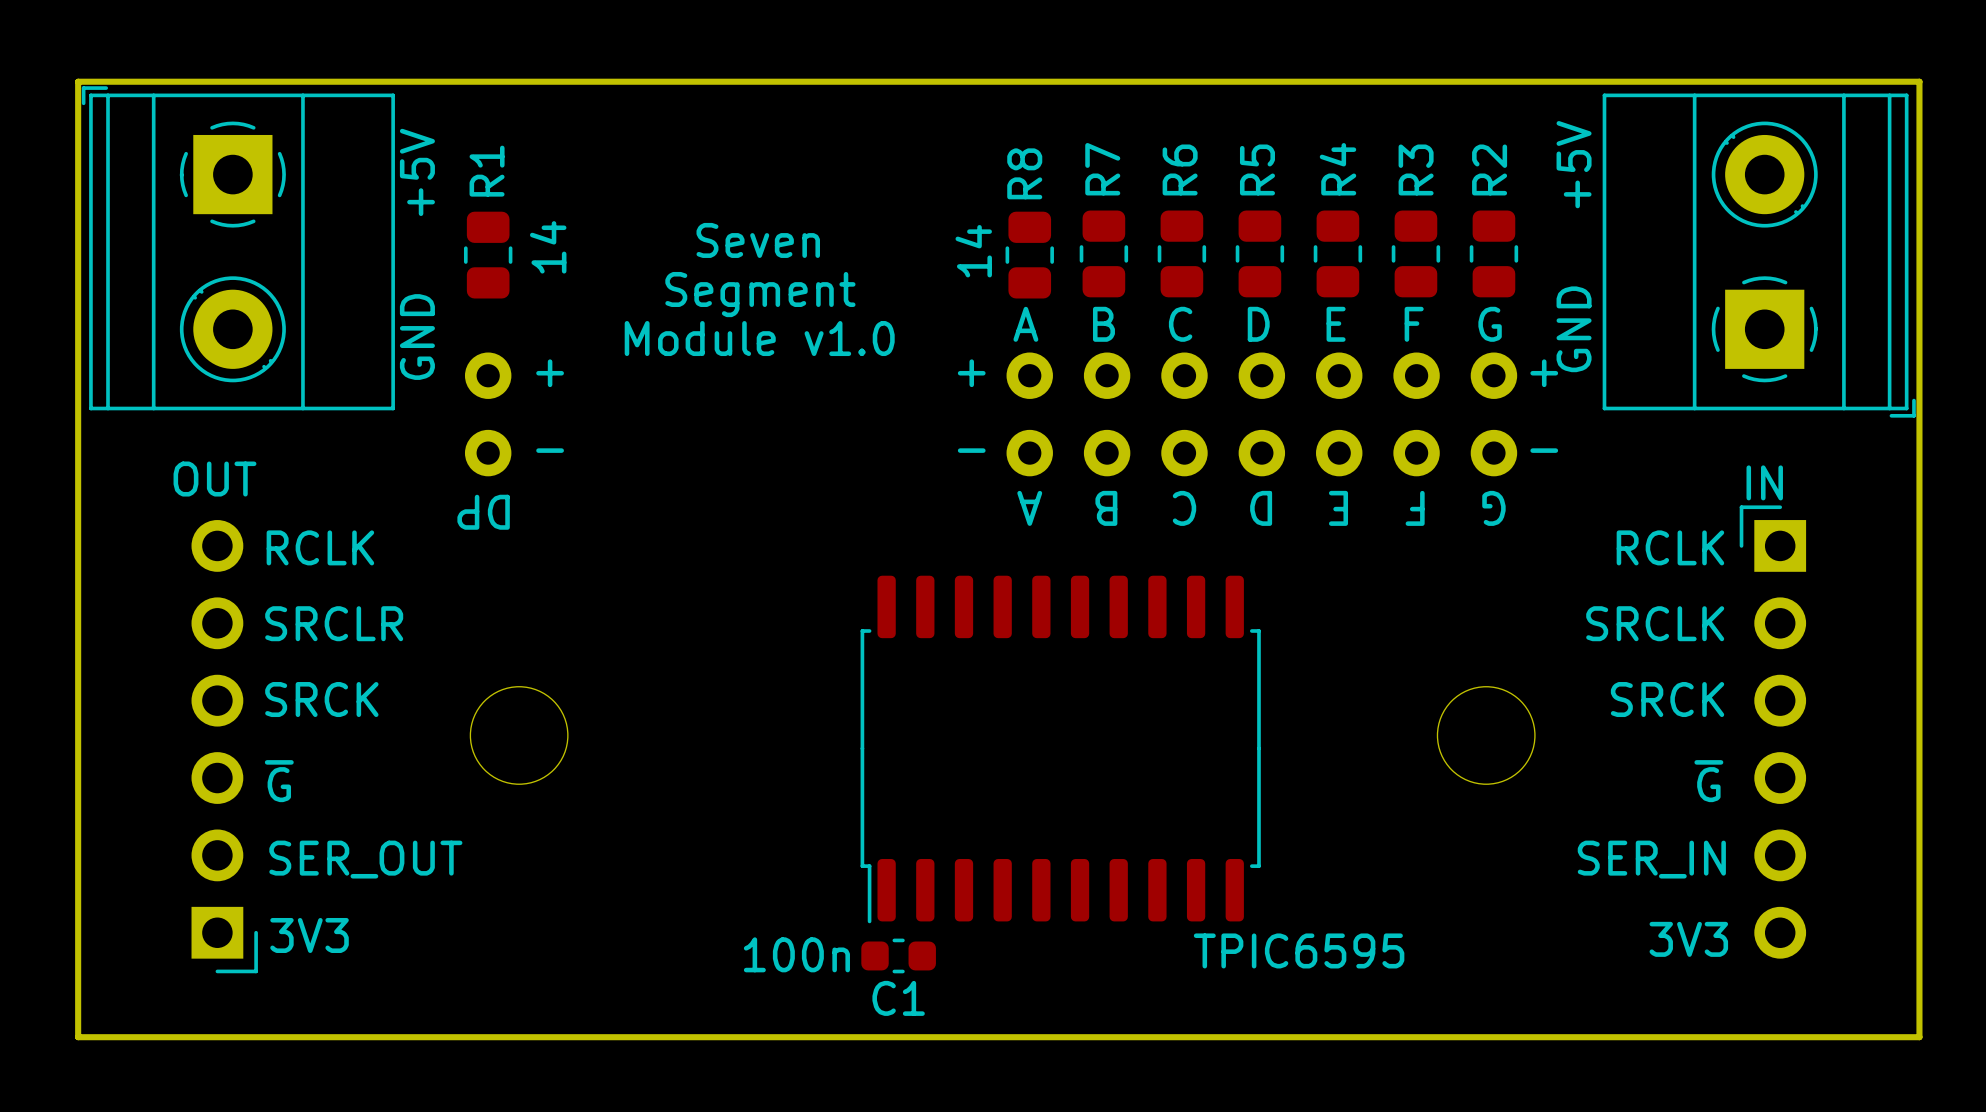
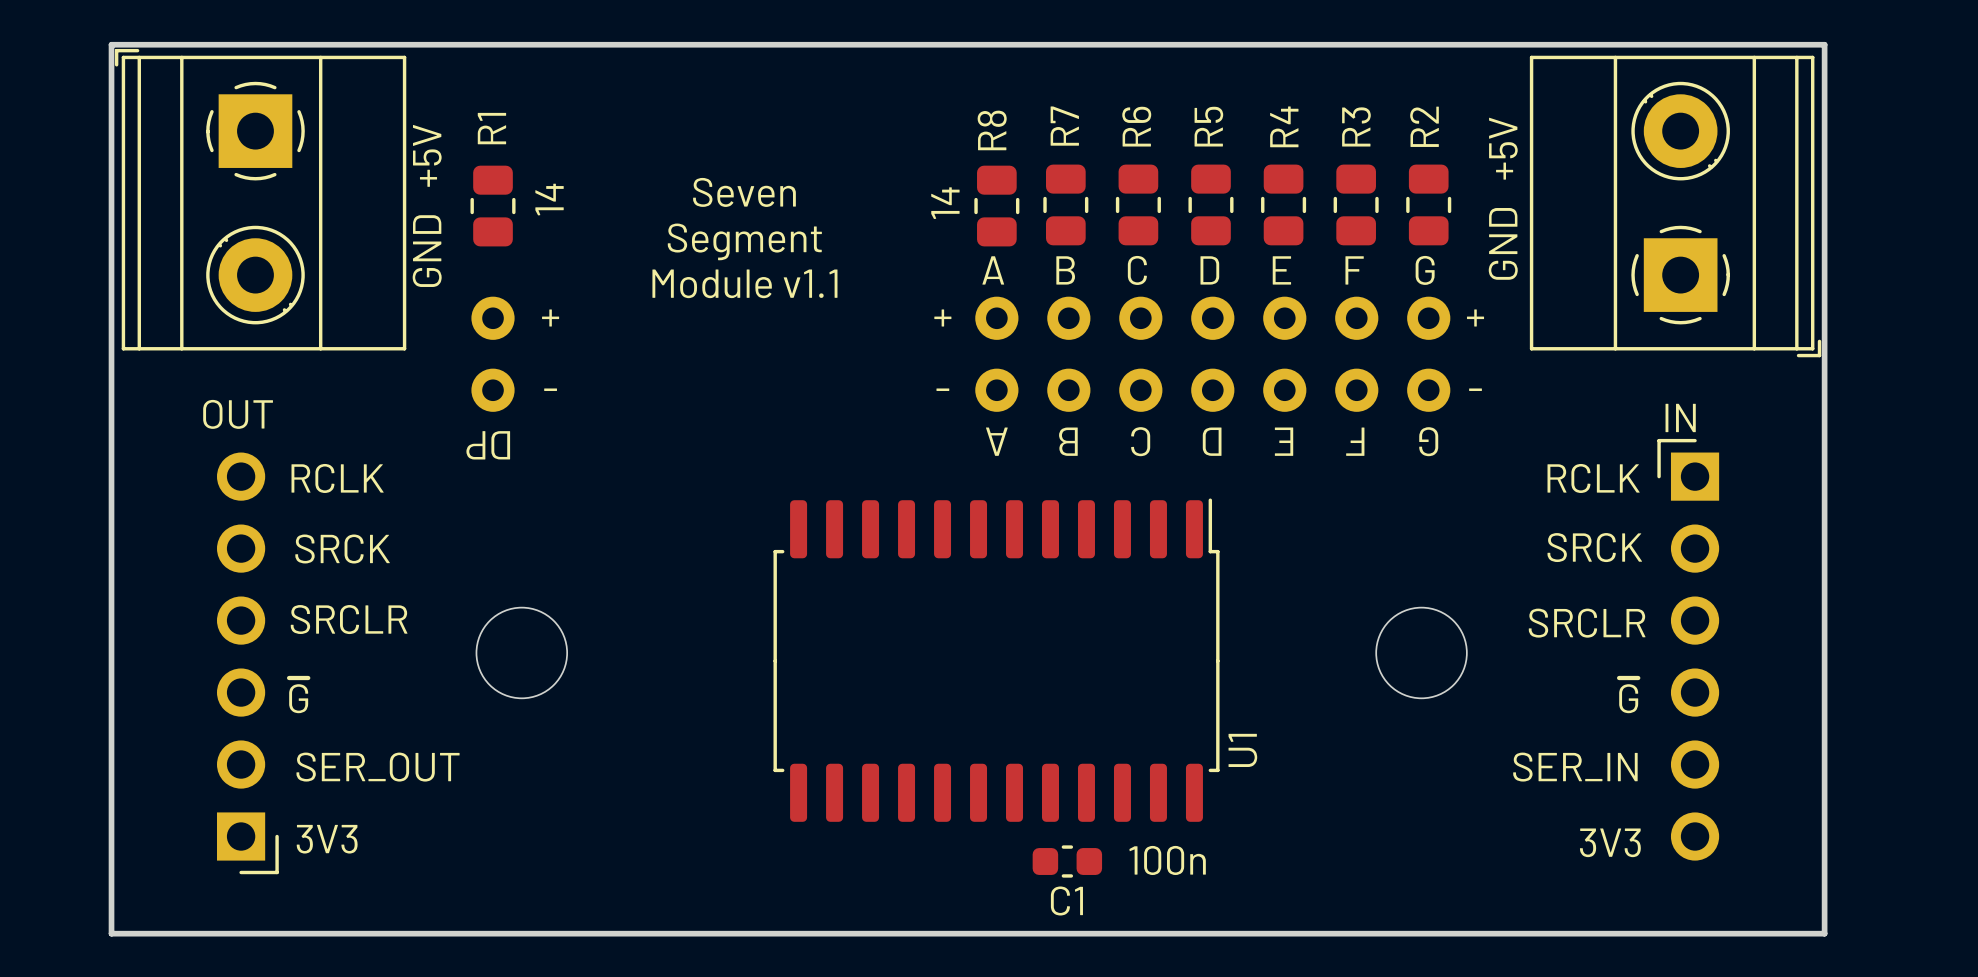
text: Module v1.0 (759, 338) -> Module v1.1 (744, 283)
text: SRCLR (334, 623) -> SRCK (342, 549)
text: SRCLK (1655, 623) -> SRCK (1594, 547)
text: SRCK (321, 699) -> SRCLR (349, 619)
text: SRCK (1667, 699) -> SRCLR (1587, 623)
U1: none -> (996, 660)
TPIC6595: (1060, 749) -> none
text position: 100n (796, 954) -> 100n (1167, 860)
C1 position: (898, 955) -> (1067, 861)

